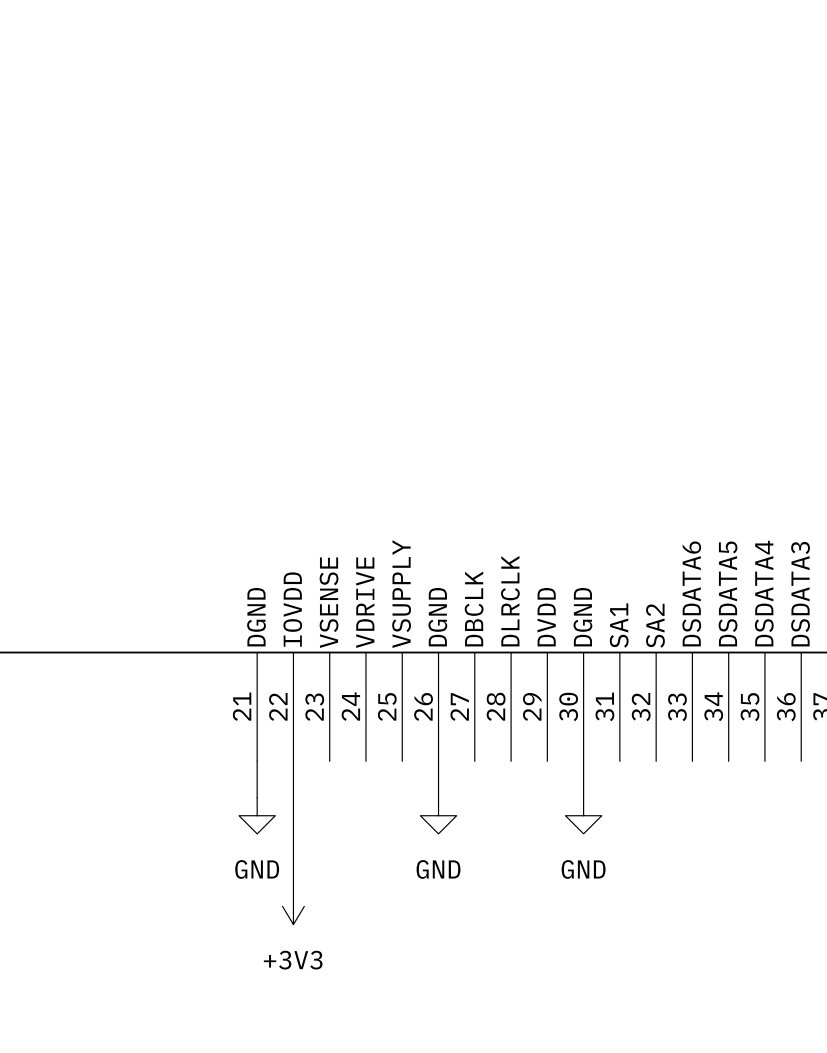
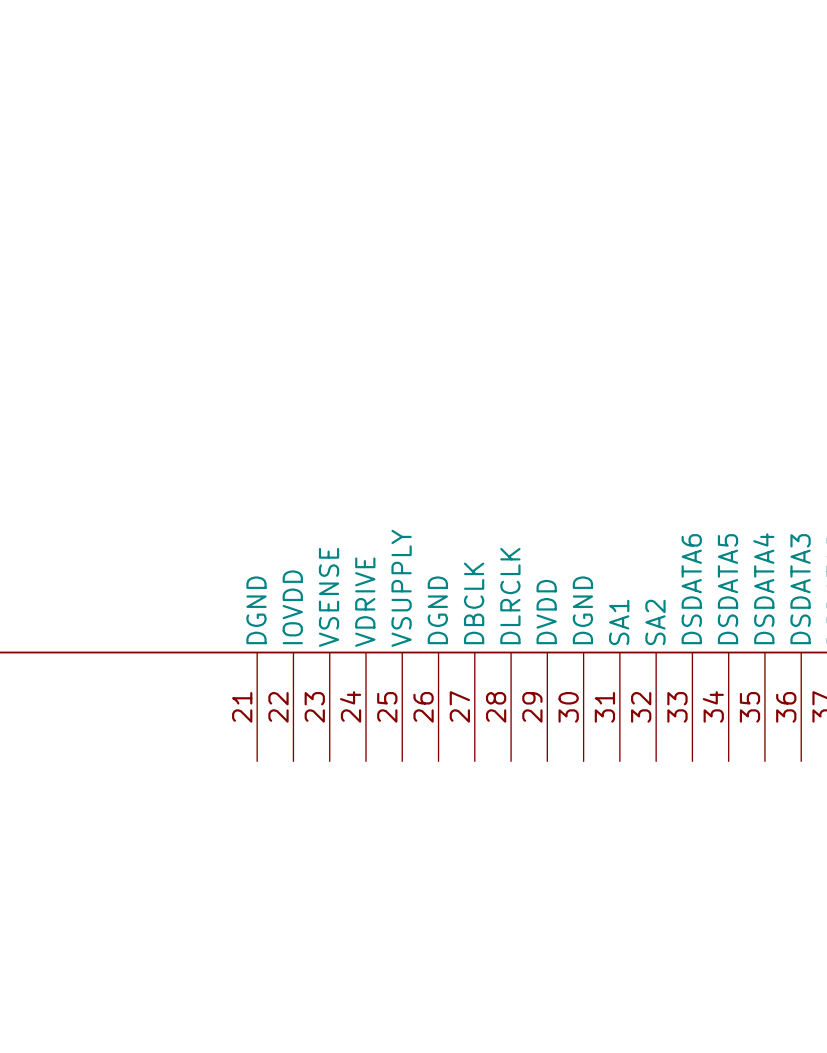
wire: (257, 761) (257, 797) -> none
wire: (293, 761) (293, 888) -> none
wire: (438, 761) (438, 797) -> none
wire: (583, 761) (583, 797) -> none
power symbol: GND (257, 815) -> none
power symbol: GND (438, 815) -> none
power symbol: GND (583, 815) -> none
power symbol: +3V3 (293, 906) -> none

